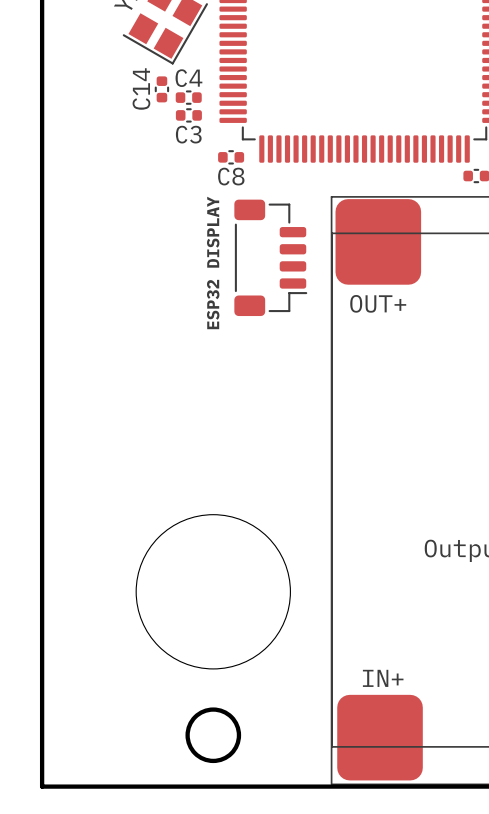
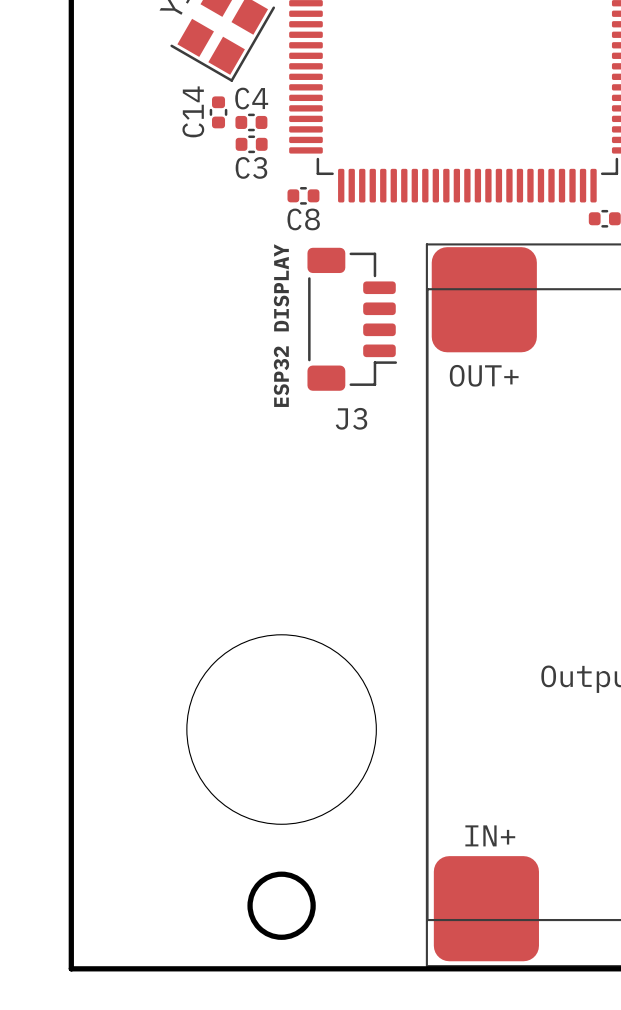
J3 name: none -> J3 (351, 418)

